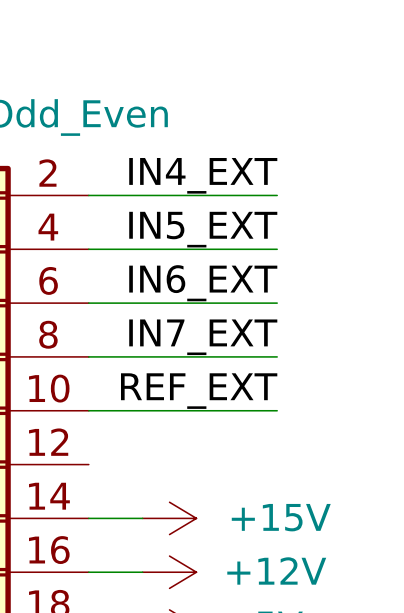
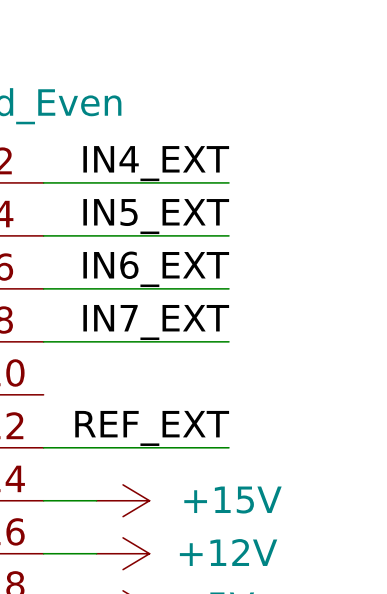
label position: REF_EXT (199, 391) -> REF_EXT (152, 428)
wire: (88, 410) (277, 410) -> (43, 447) (228, 447)

